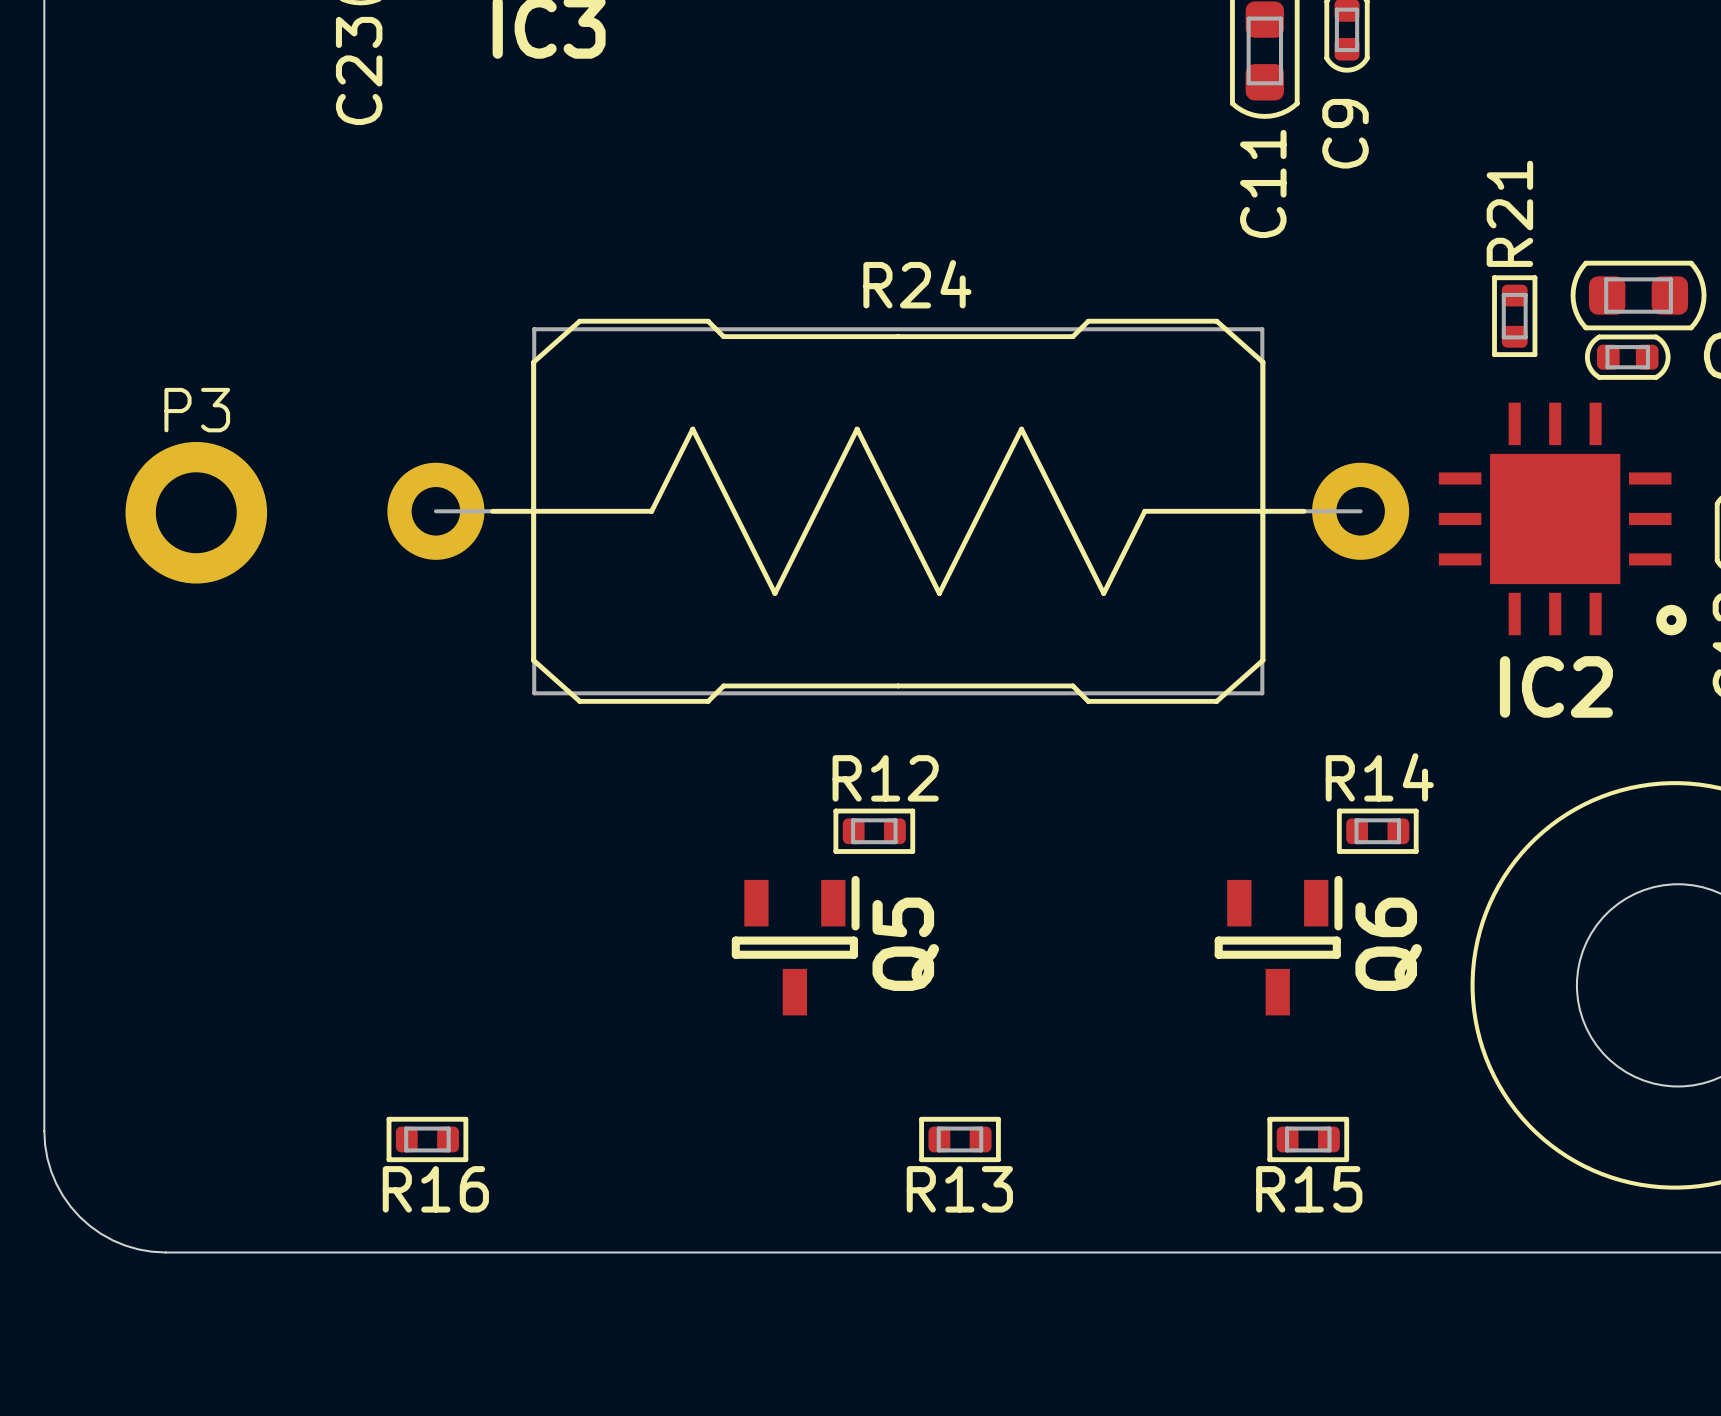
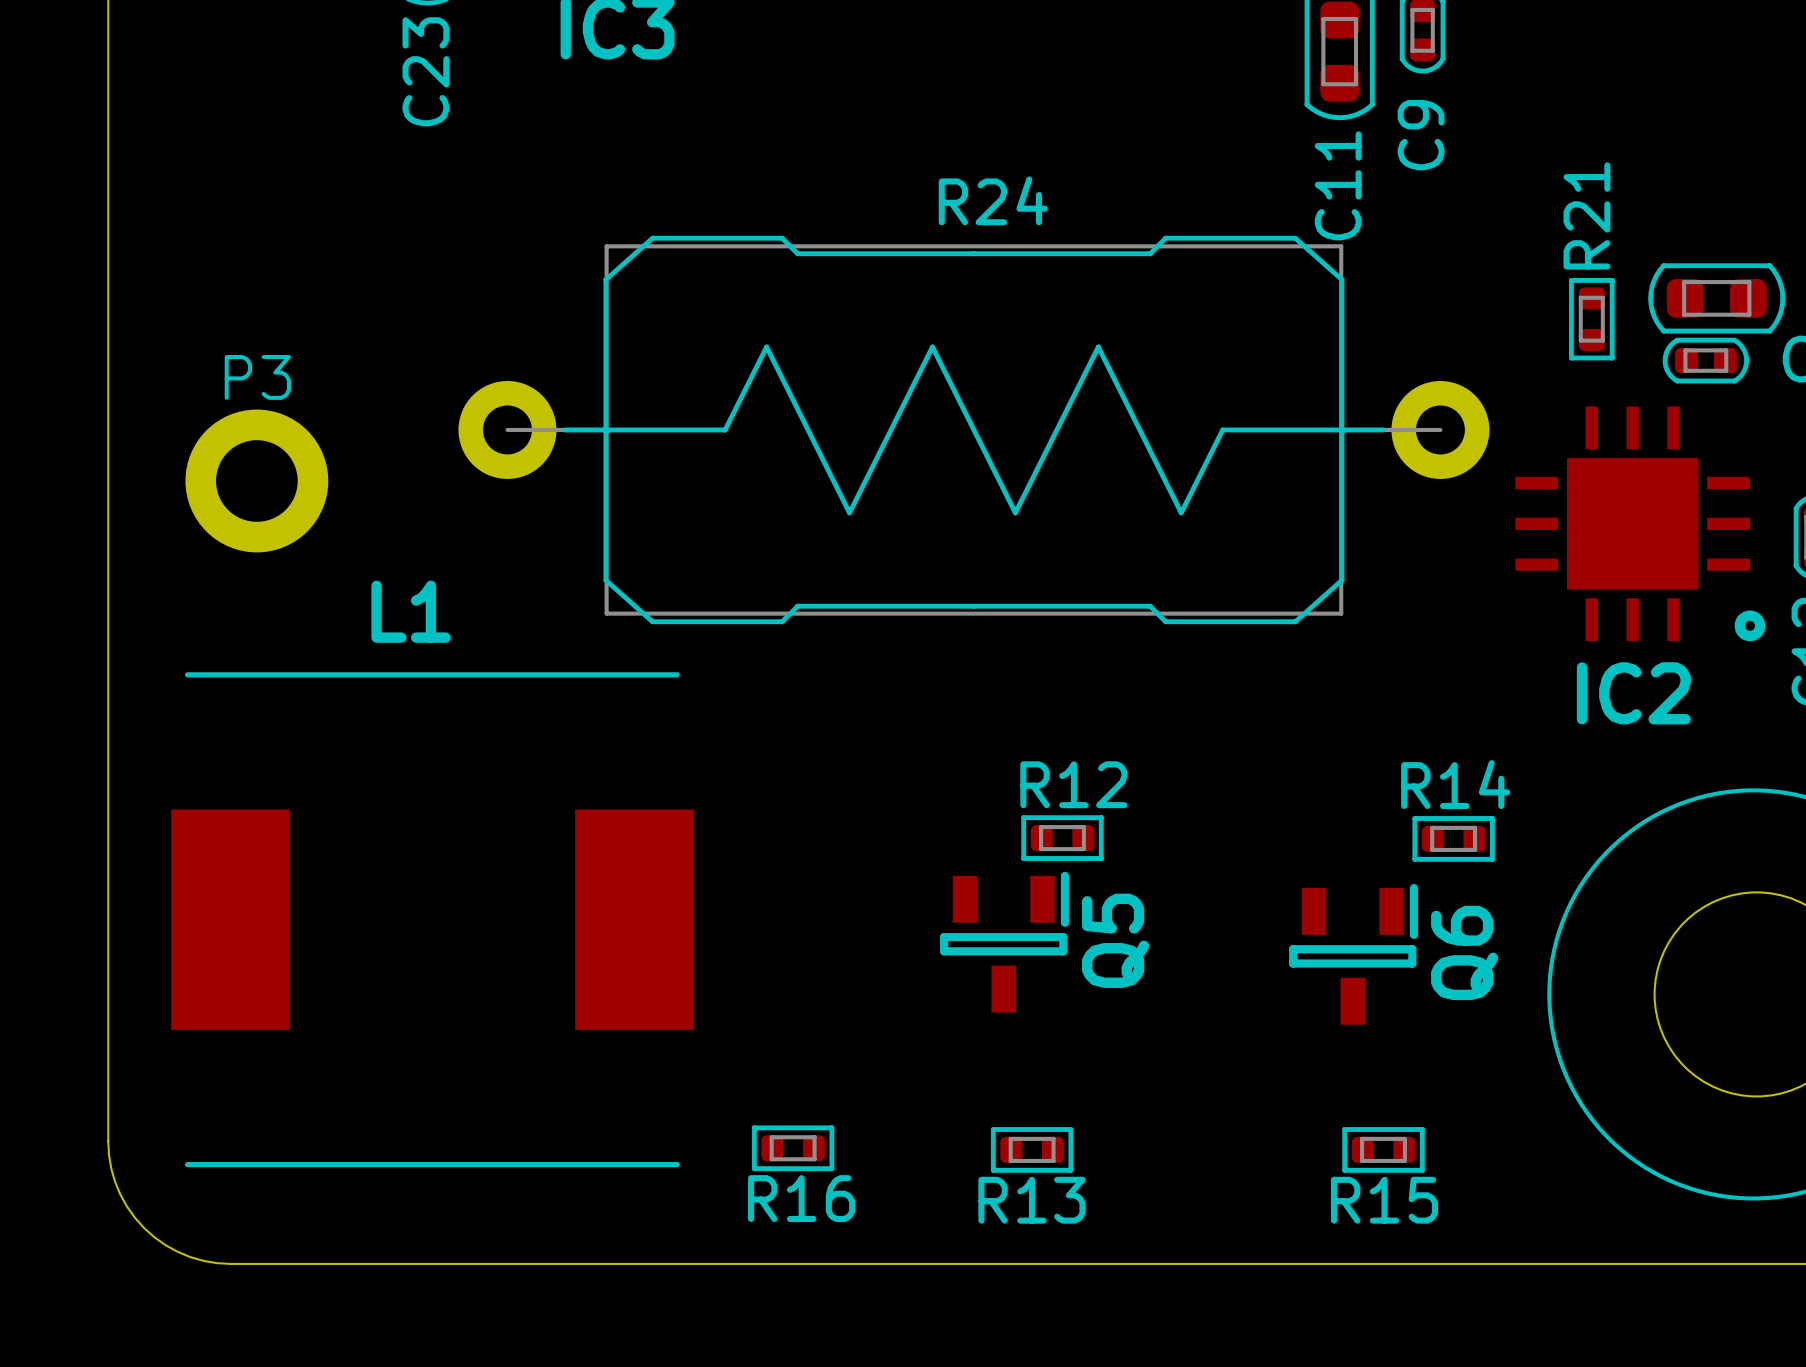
R24 position: (898, 511) -> (973, 429)
P3 position: (196, 512) -> (256, 480)
R12 position: (874, 831) -> (1062, 838)
L1: none -> (432, 919)
Q5 position: (795, 945) -> (1004, 942)
R16 position: (427, 1139) -> (793, 1148)

